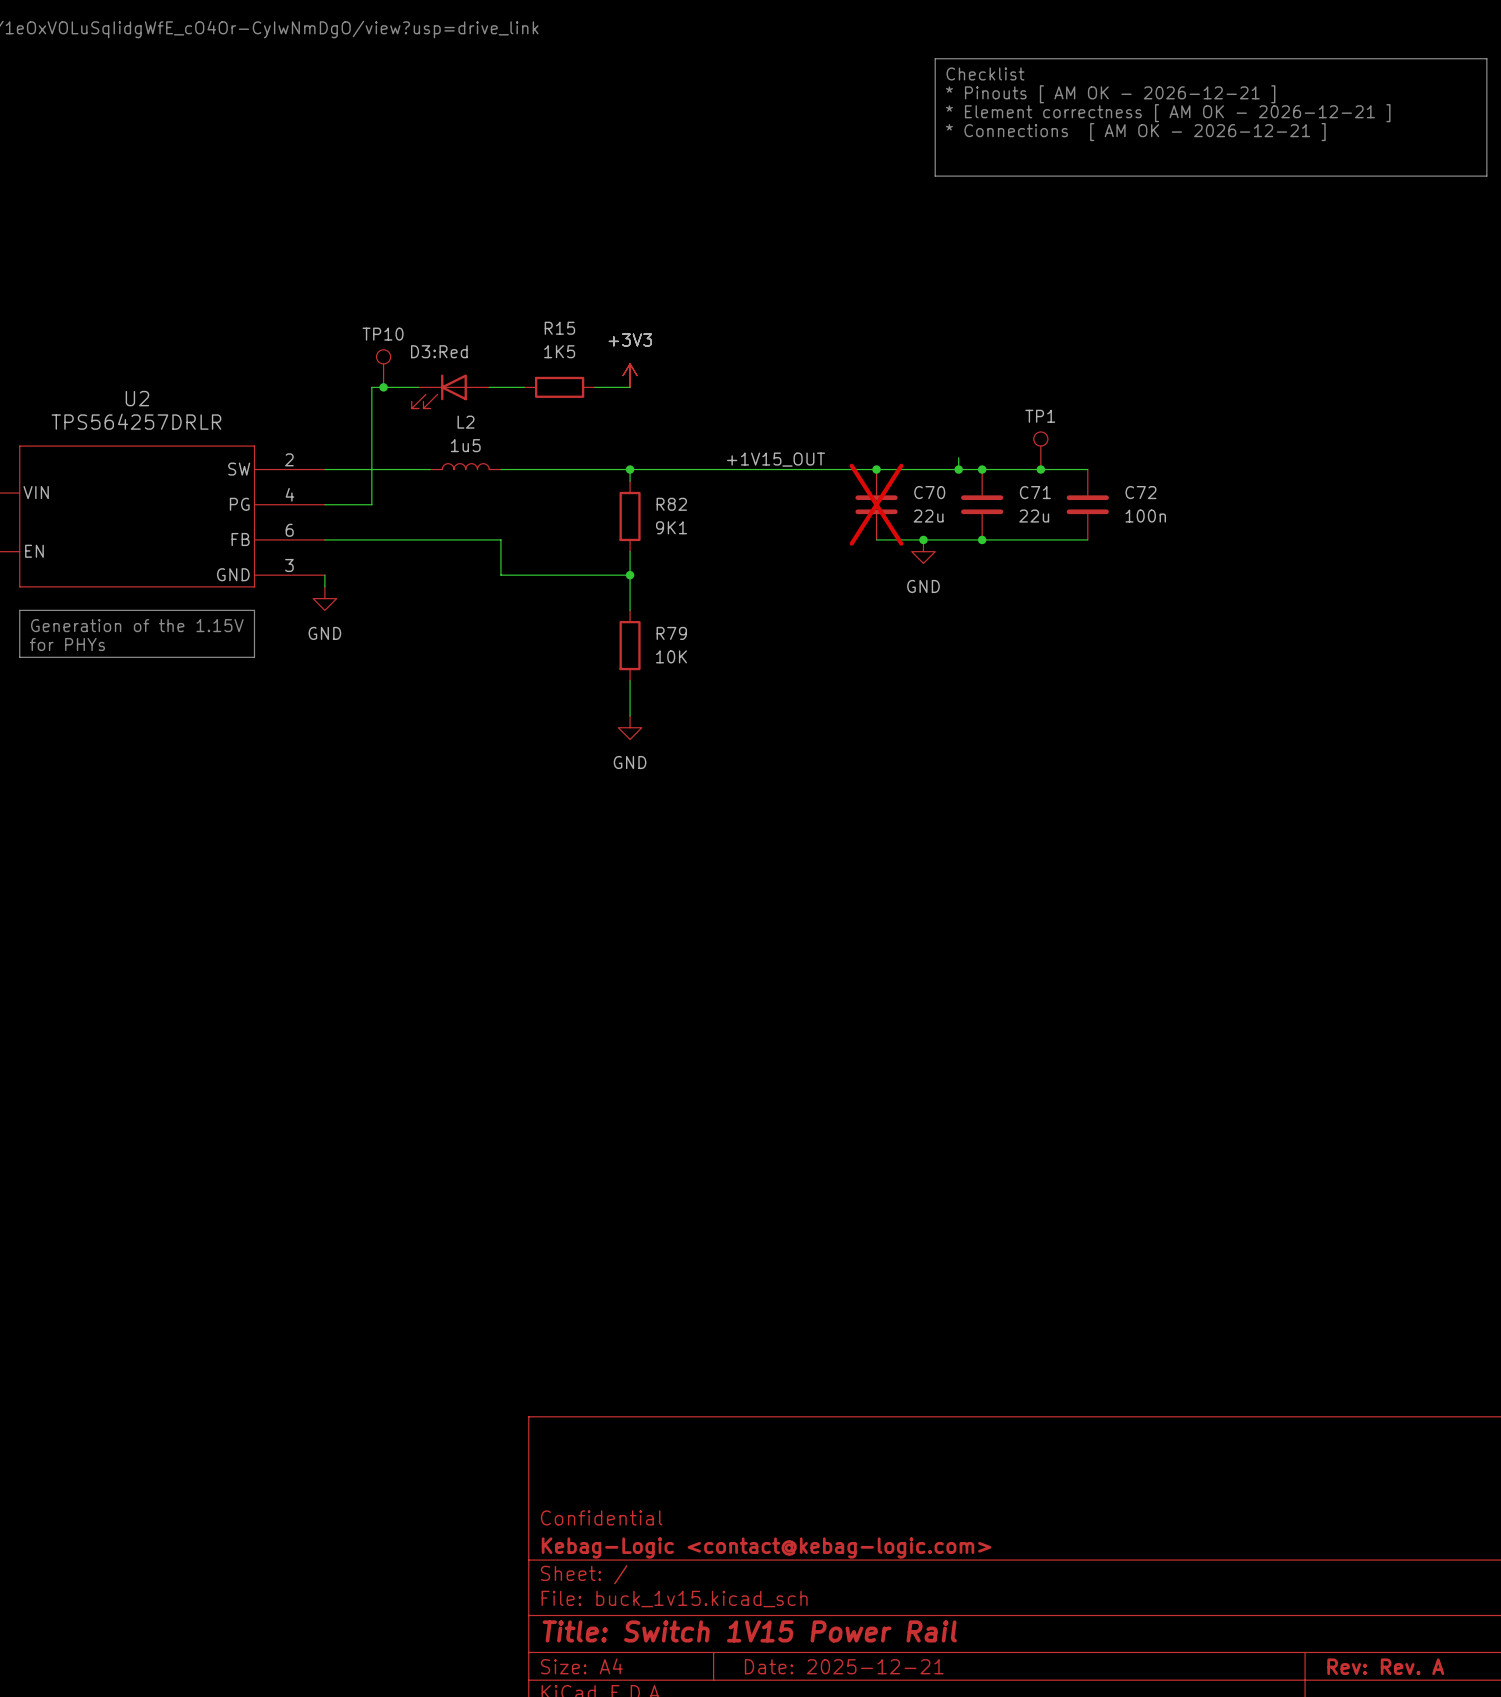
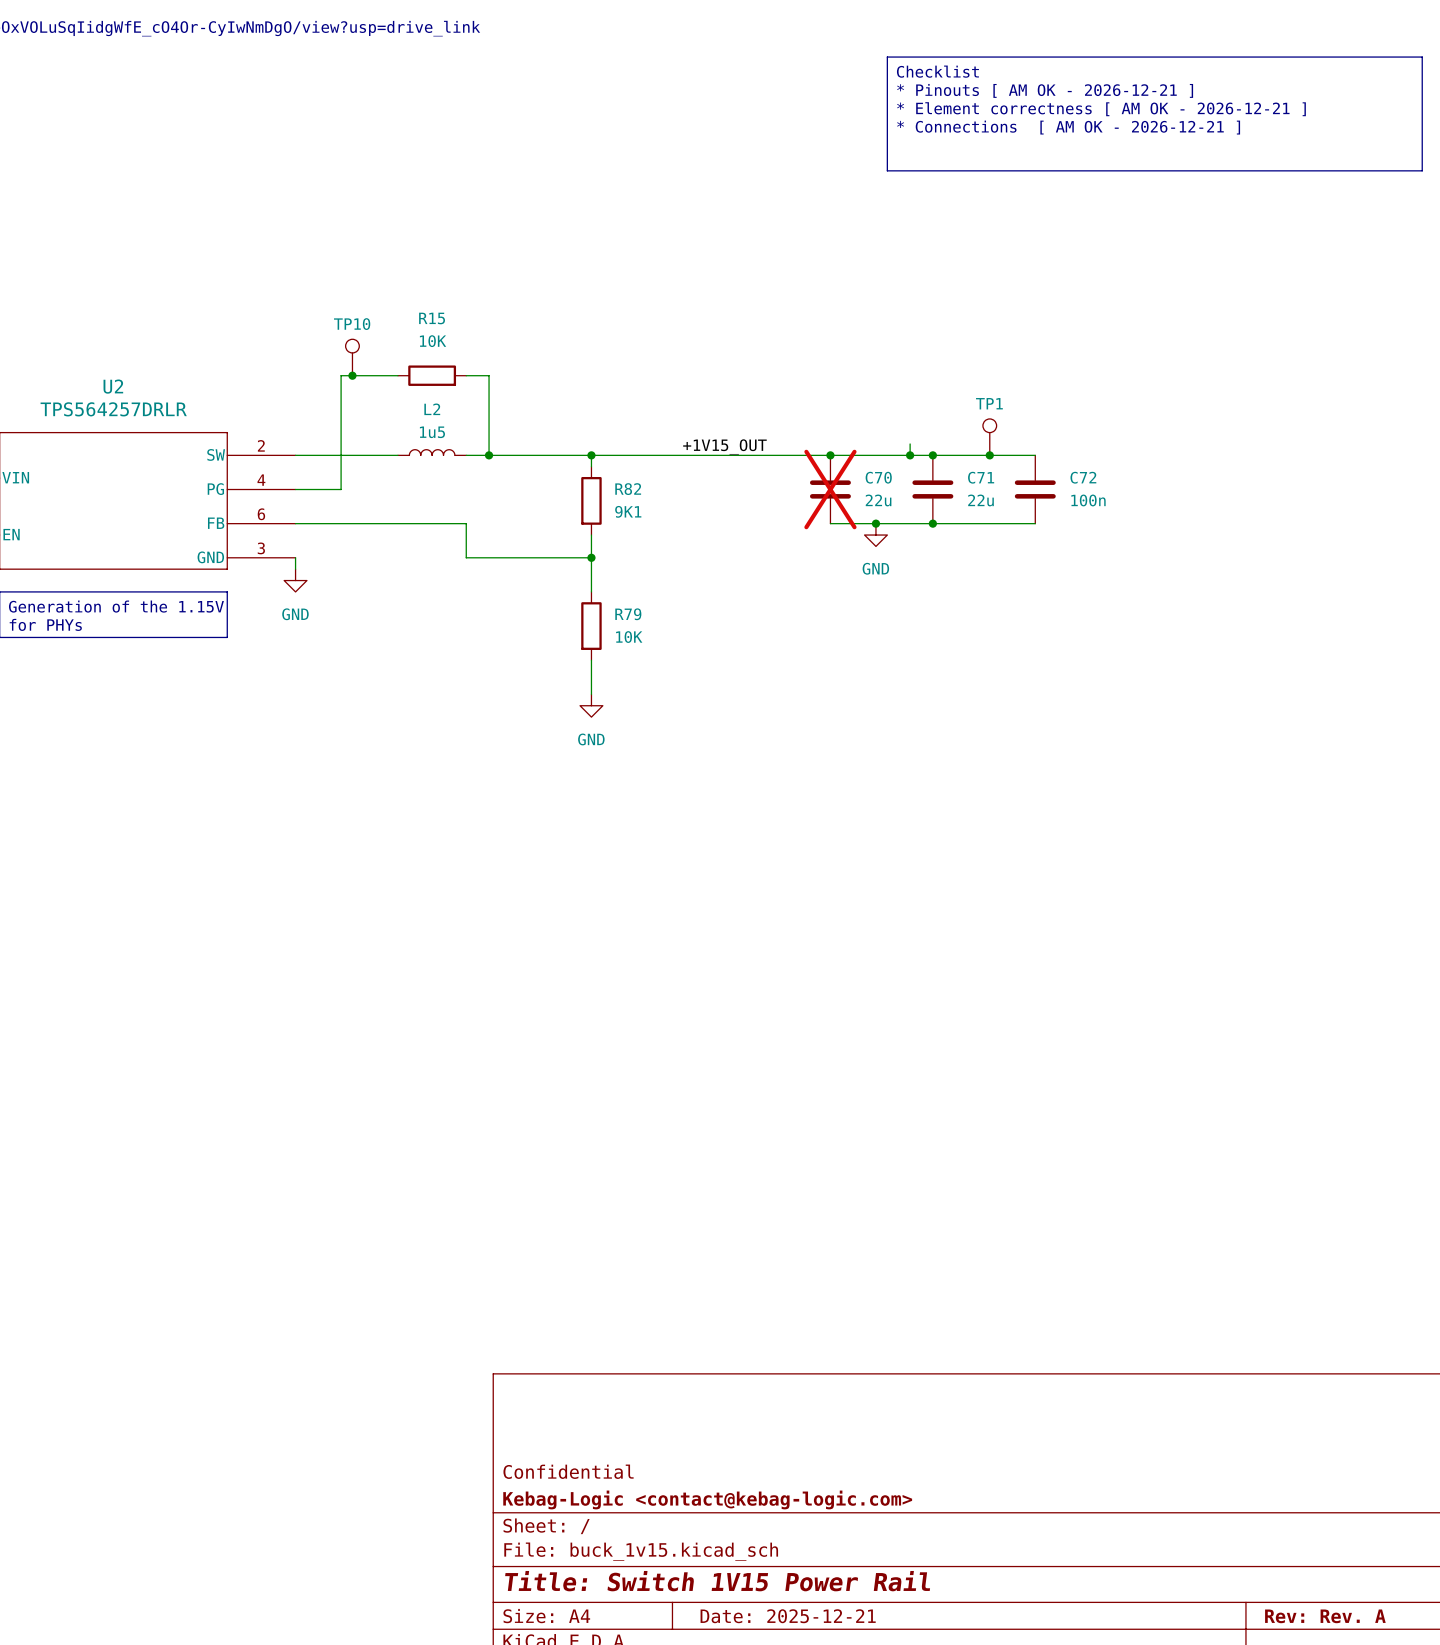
R15 value: 1K5 (559, 351) -> 10K (433, 341)
power symbol: +3V3 (630, 375) -> none
wire: none -> (489, 375) (489, 455)
R15 position: (559, 387) -> (432, 375)
wire: (594, 387) (630, 387) -> none
part: (450, 391) -> none
junction: none -> (489, 455)

